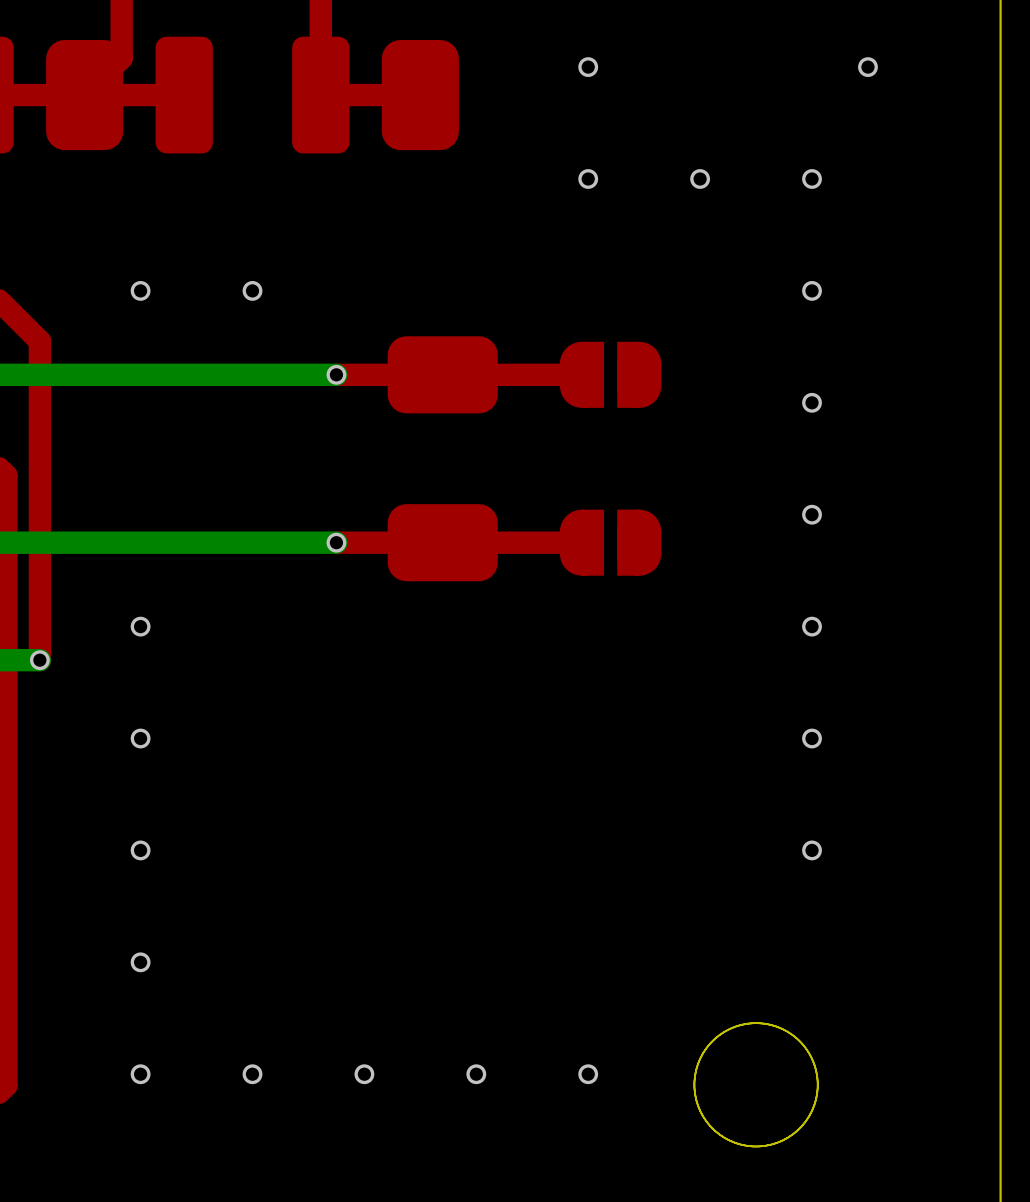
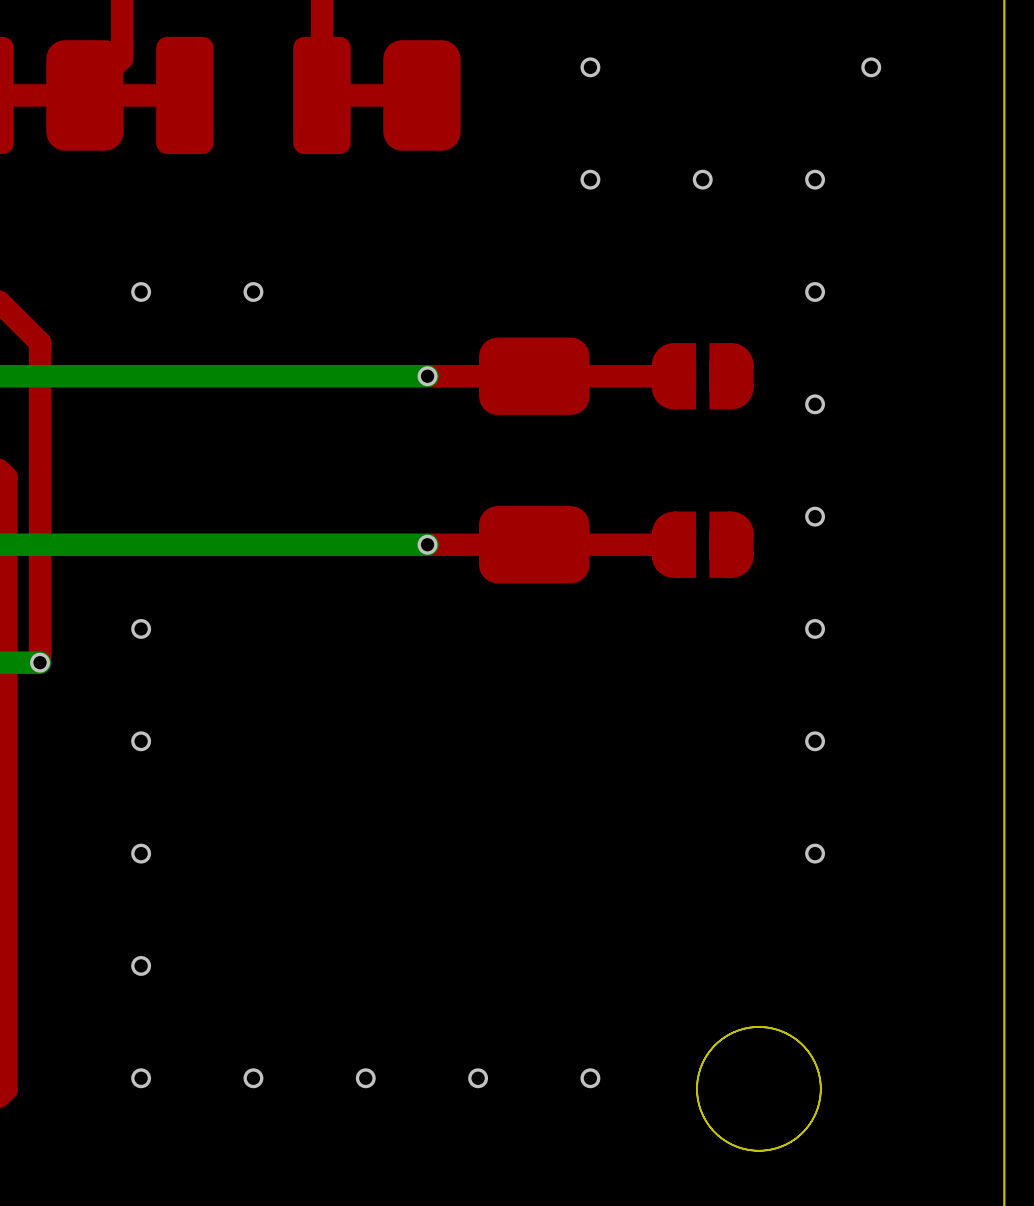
via position: (336, 374) -> (427, 376)
top track: (425, 374) (336, 374) -> (674, 376) (584, 376)
bottom track: none -> (427, 376) (337, 376)
part position: (442, 374) -> (534, 376)
part position: (610, 374) -> (702, 376)
via position: (336, 542) -> (427, 544)
top track: (425, 542) (336, 542) -> (674, 544) (584, 544)
bottom track: none -> (427, 544) (337, 544)
part position: (442, 542) -> (534, 544)
part position: (610, 542) -> (702, 544)

